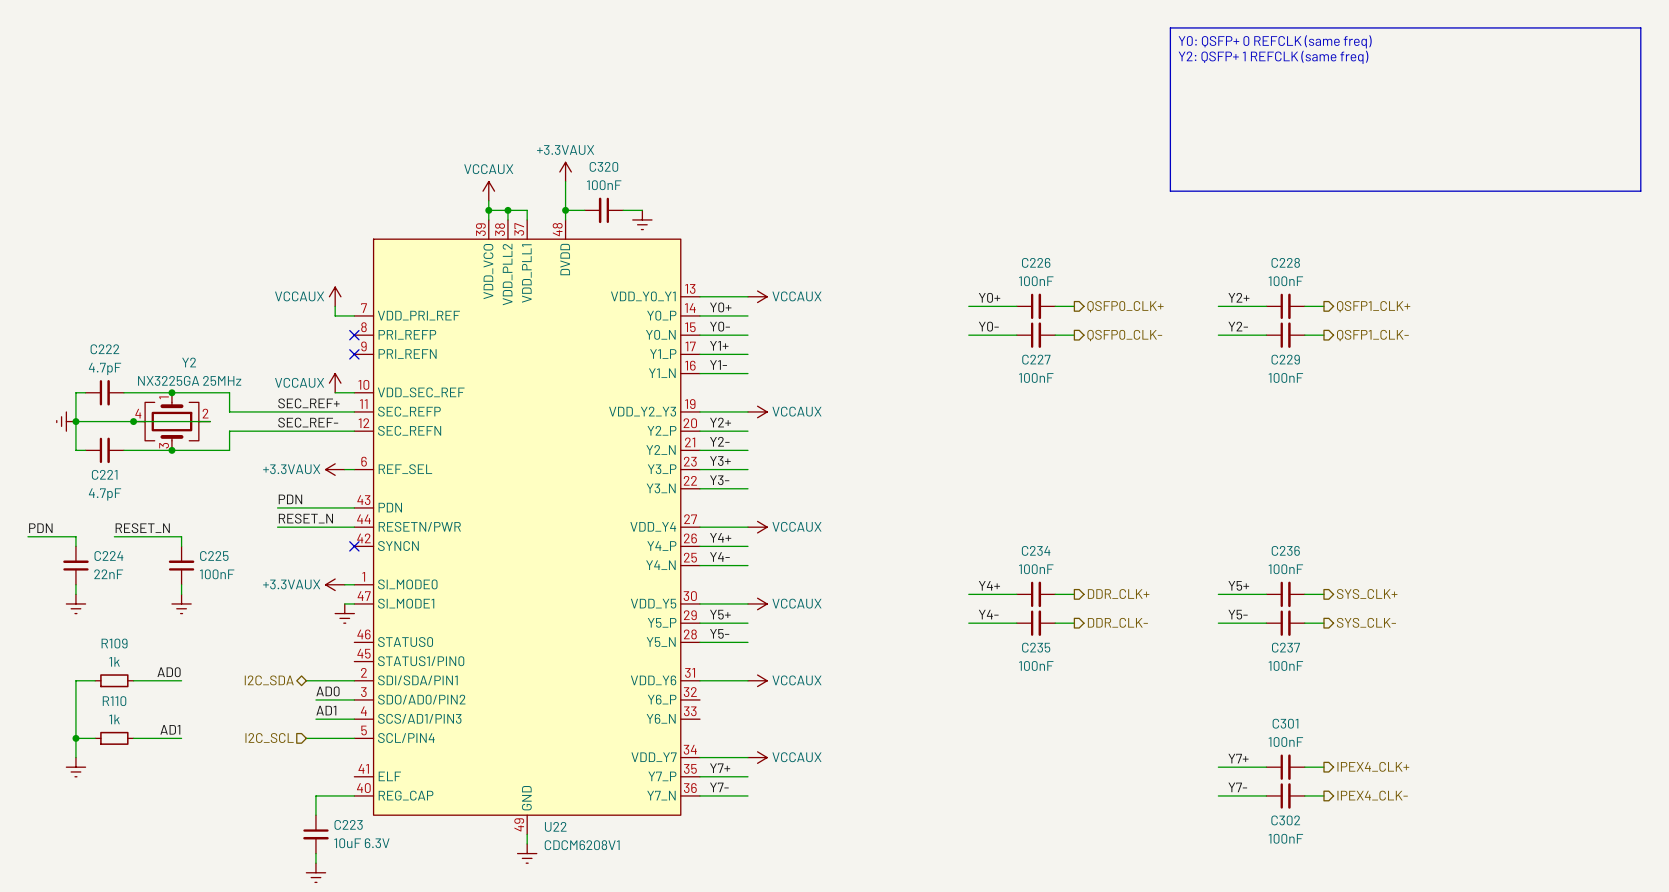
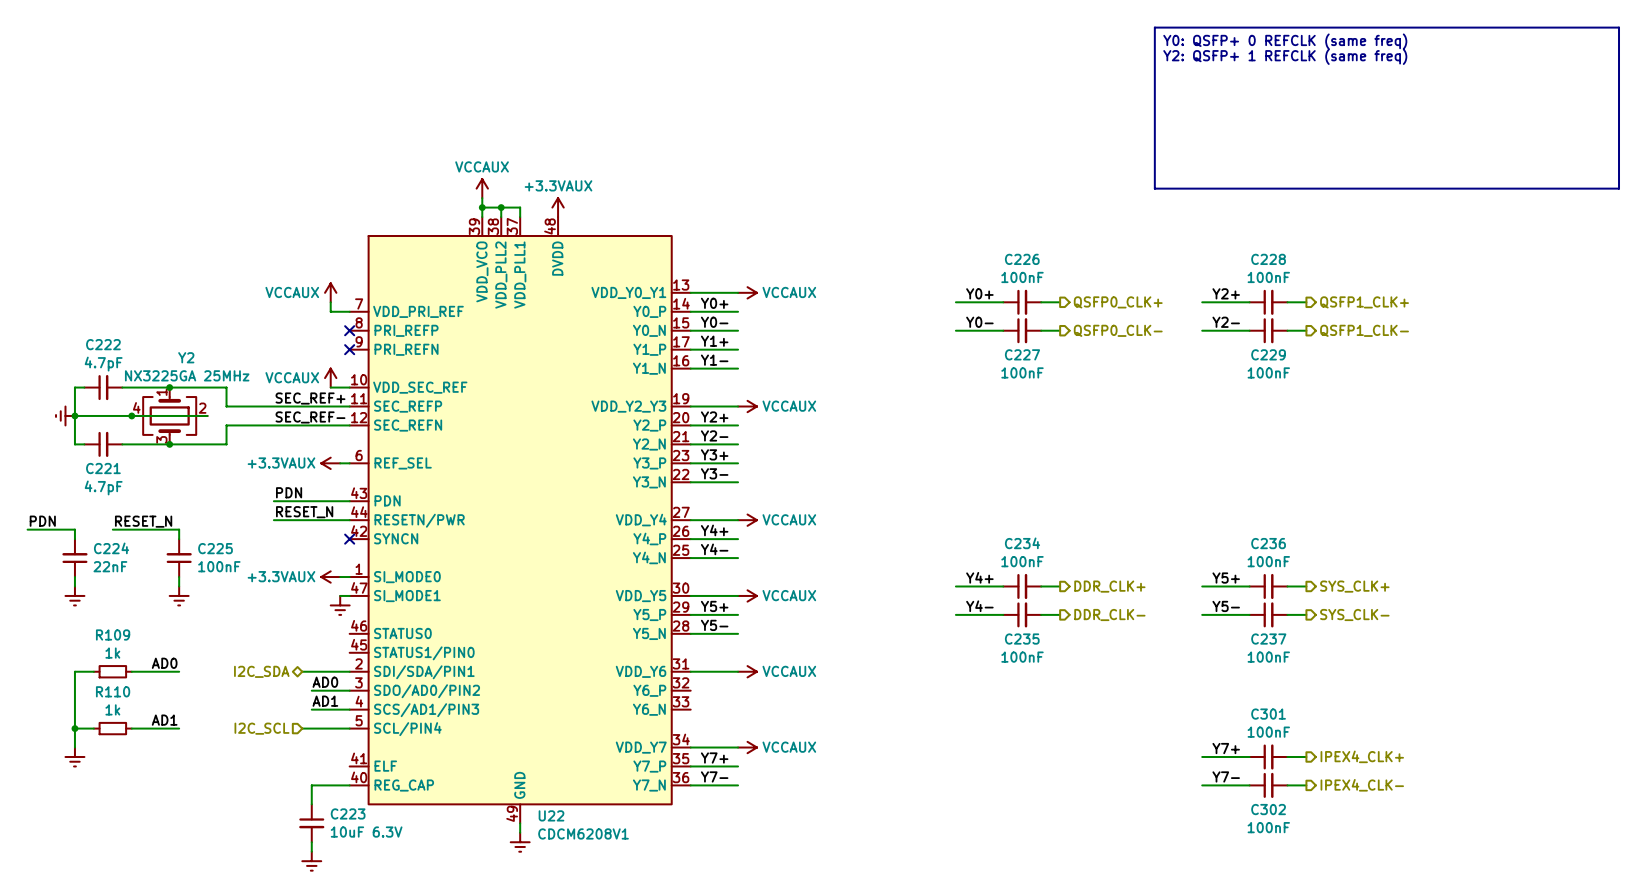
power symbol position: +3.3VAUX (565, 171) -> +3.3VAUX (558, 207)
wire: (565, 210) (584, 210) -> none
junction: (565, 210) -> none
C320: 100nF (603, 210) -> none
wire: (623, 210) (642, 210) -> none
power symbol: (642, 219) -> none

